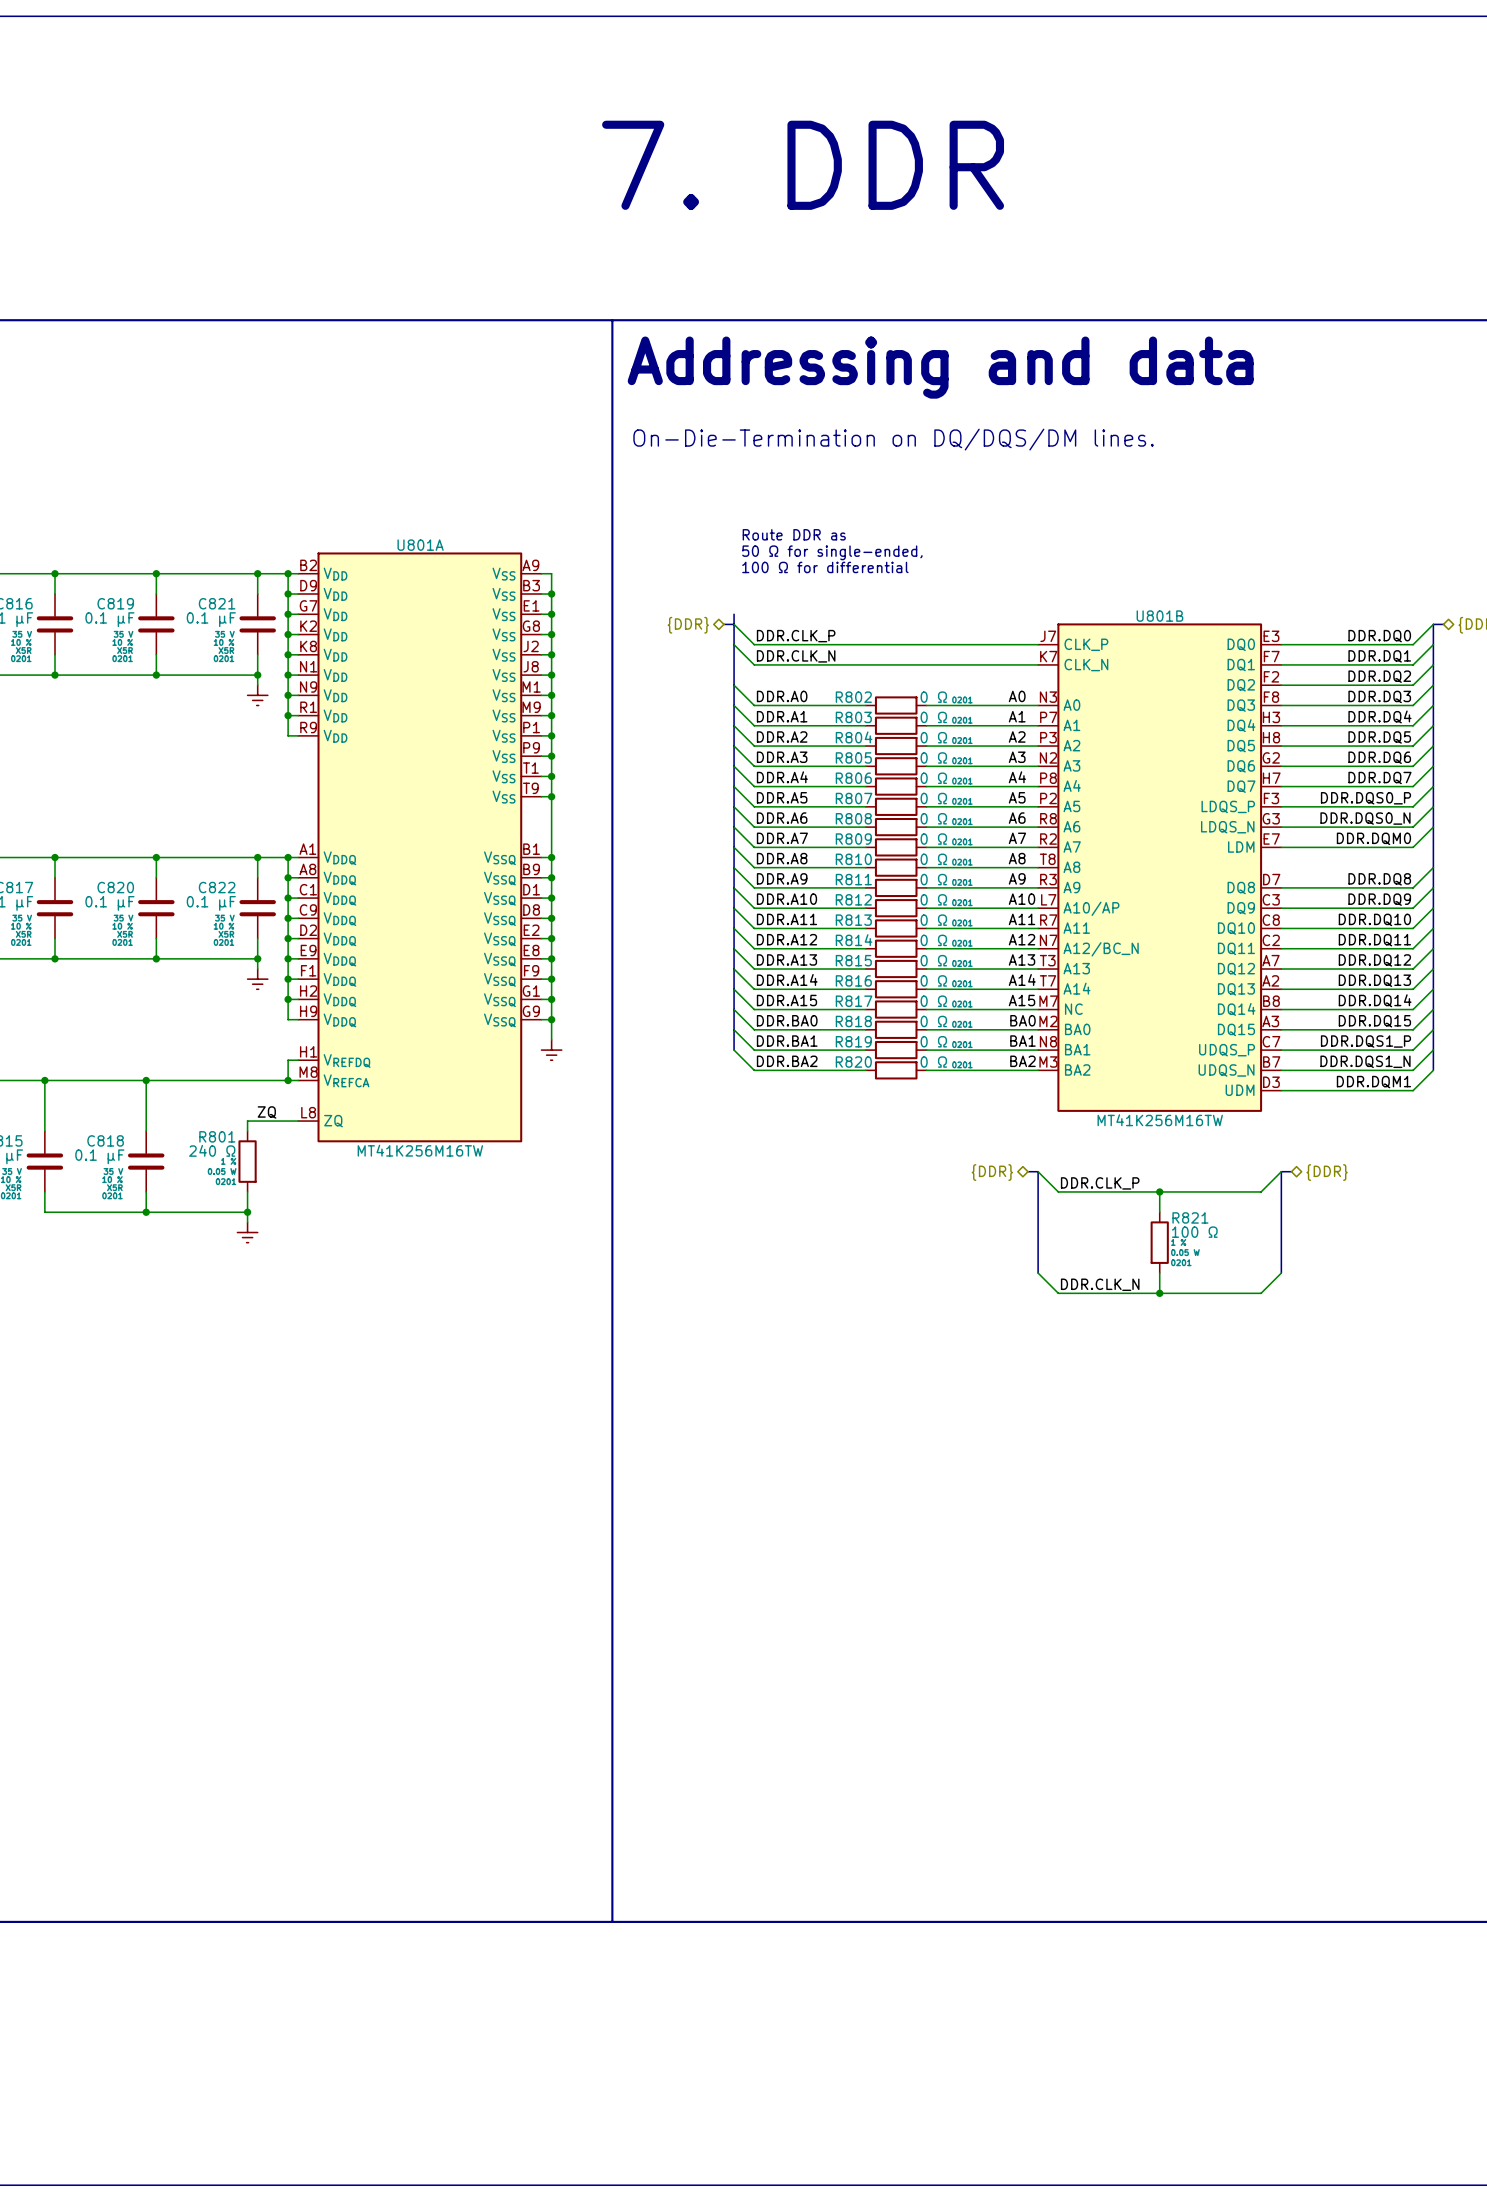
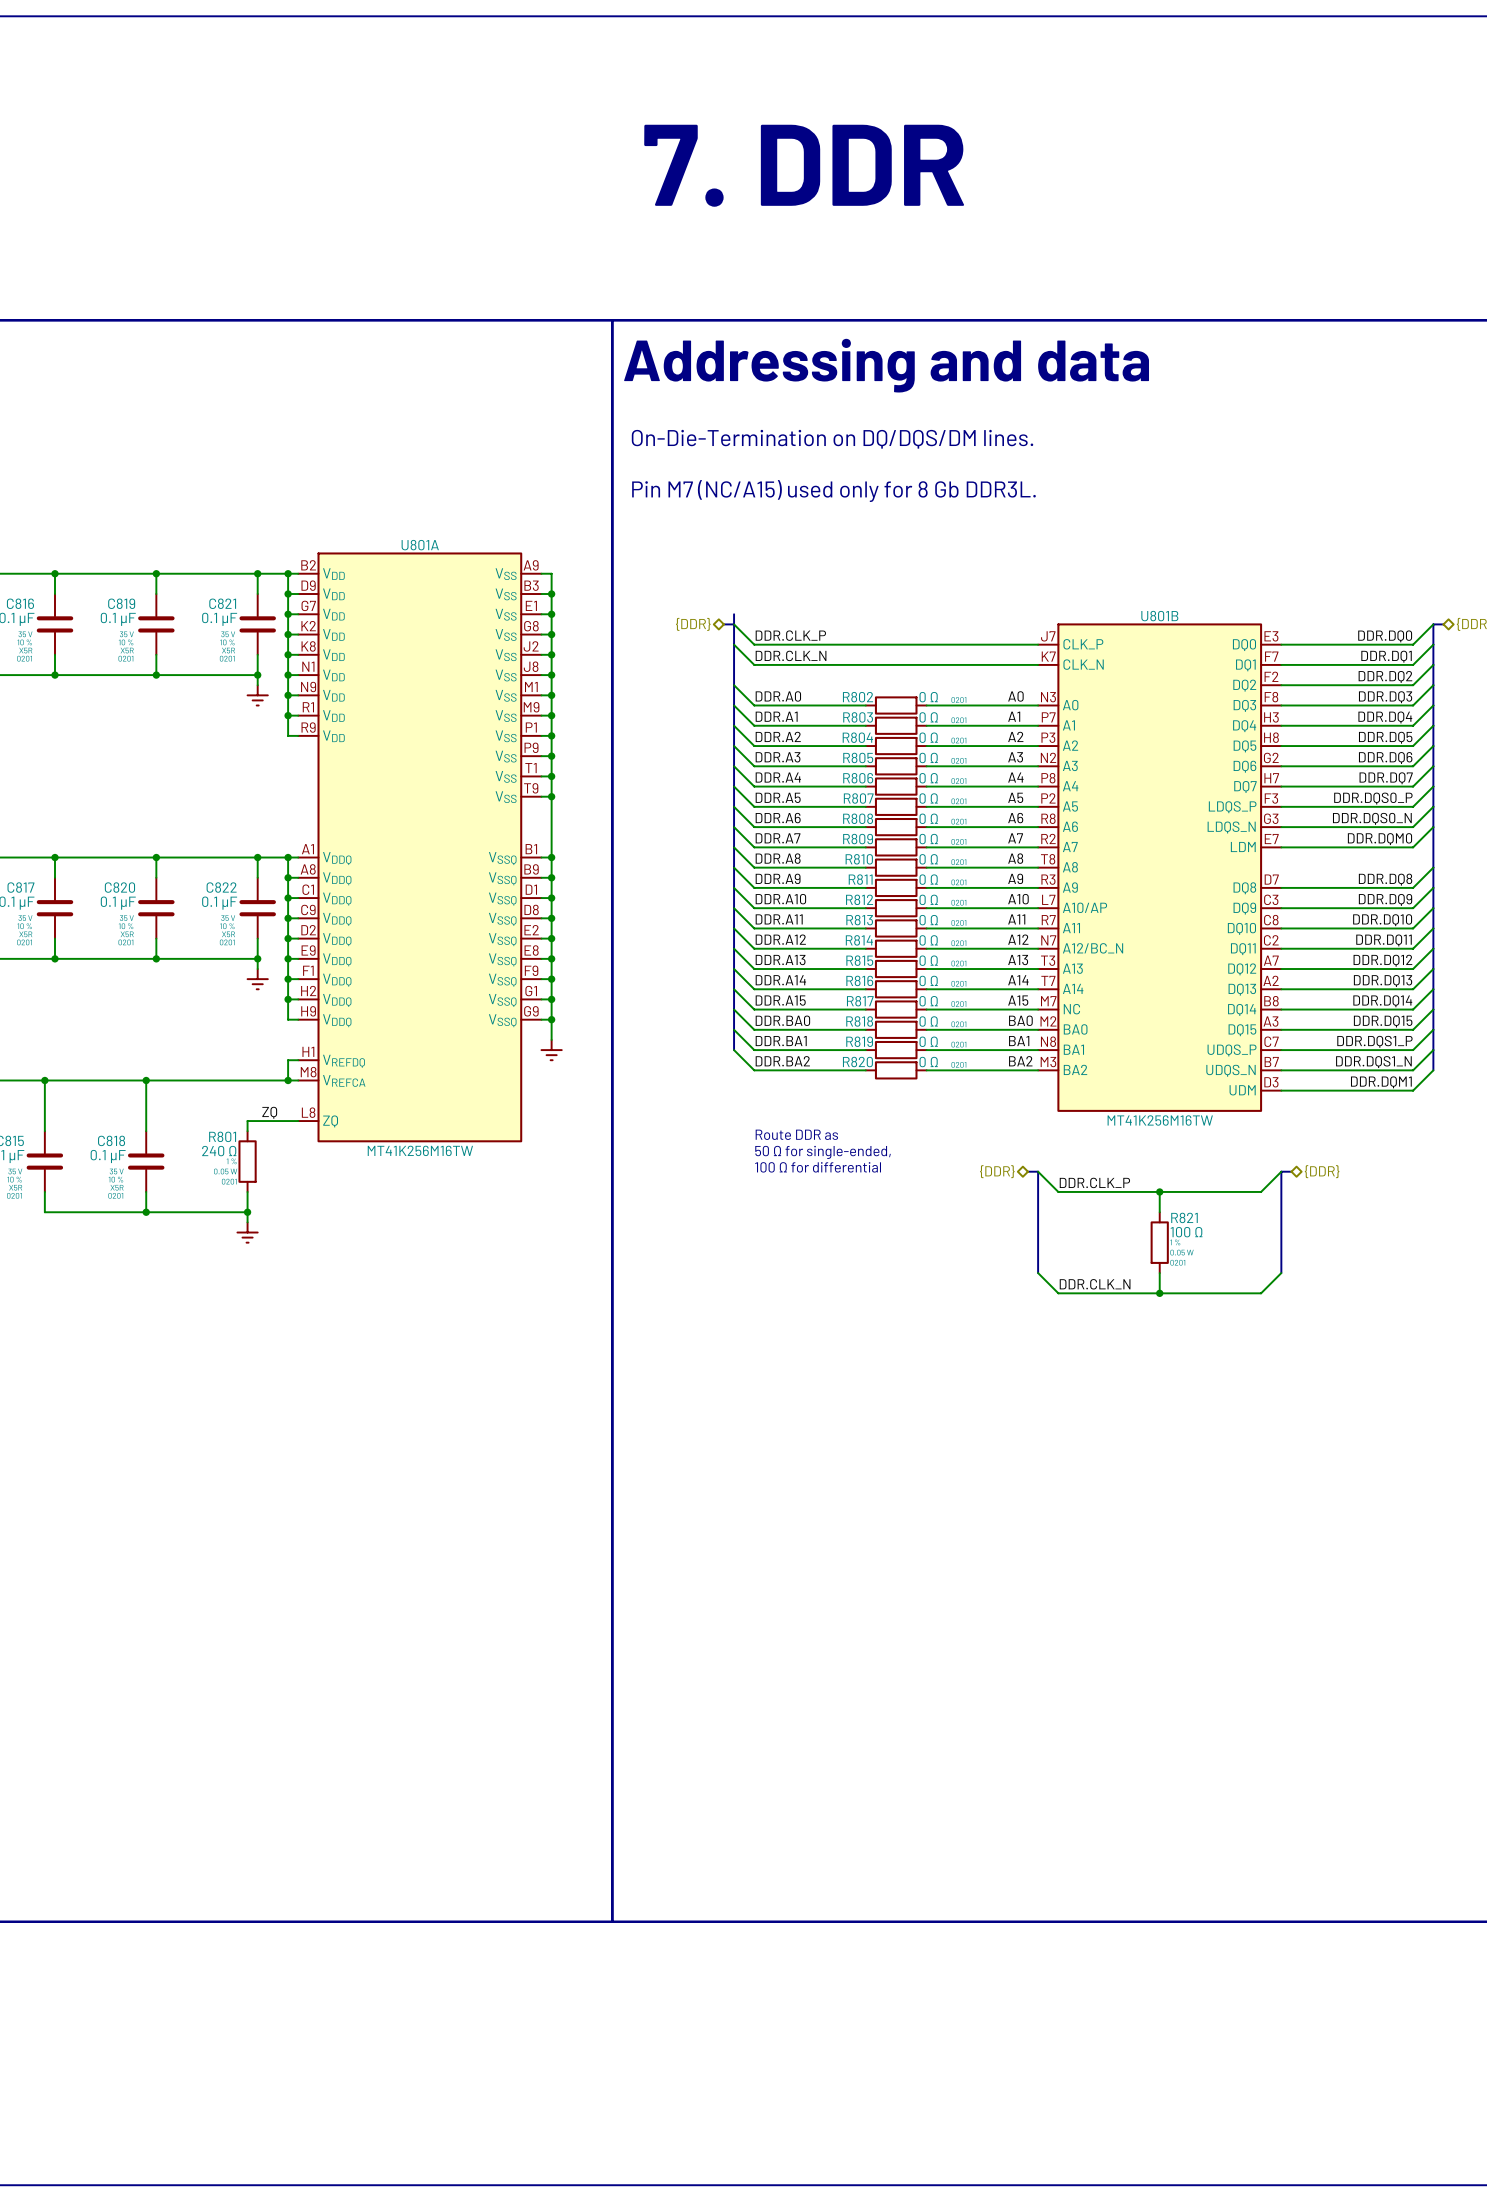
text: none -> Pin M7 (NC/A15) used only for 8 Gb DDR3L. (833, 491)
text: Route DDR as (794, 534) -> none
text: 50 Ω for single-ended, (832, 552) -> none
text: 100 Ω for differential (825, 567) -> none
text: none -> Route DDR as (796, 1134)
text: none -> 50 Ω for single-ended, (823, 1152)
text: none -> 100 Ω for differential (818, 1167)

